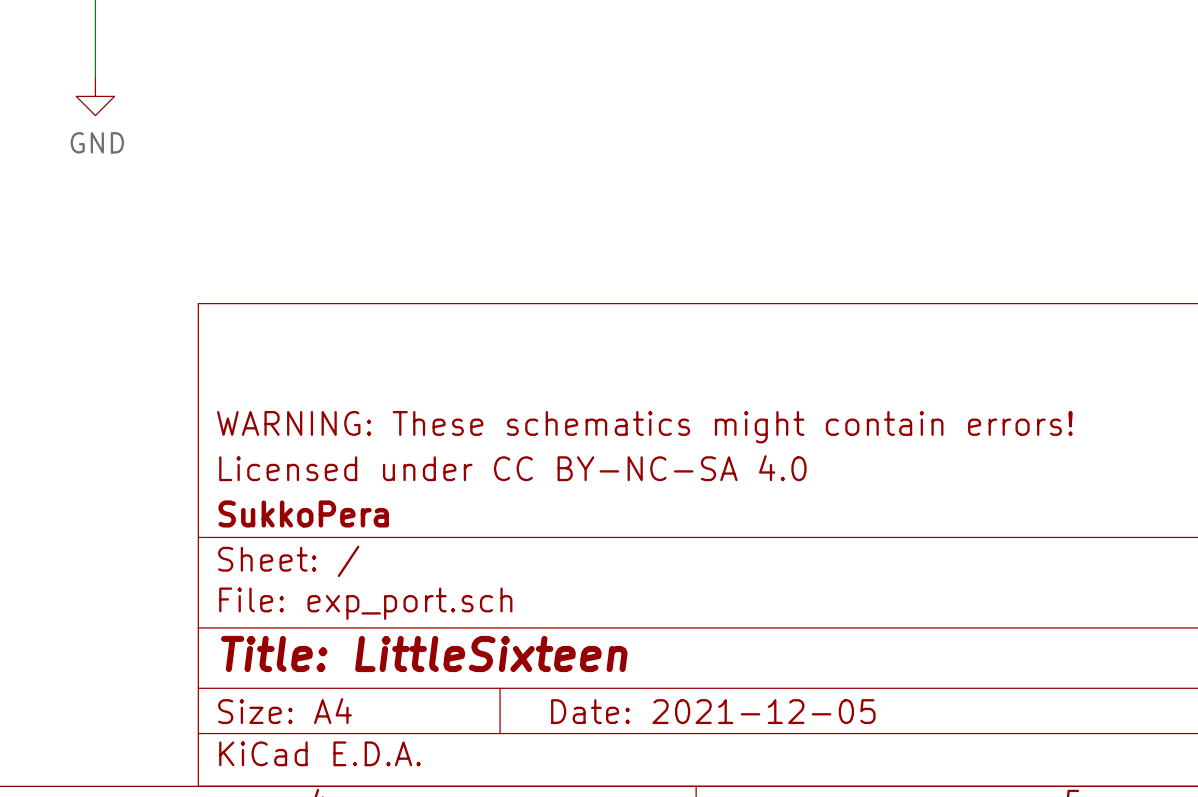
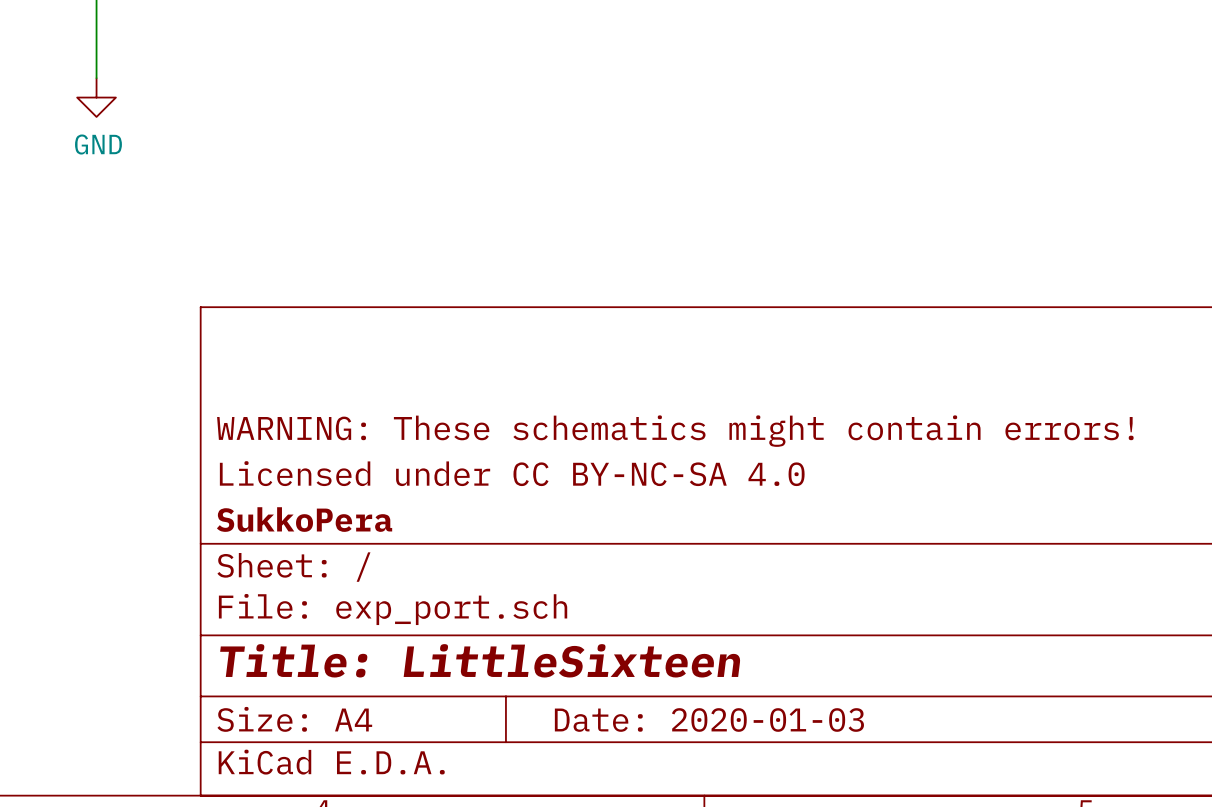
title block: Date: 2021-12-05 (713, 711) -> Date: 2020-01-03 (709, 719)

